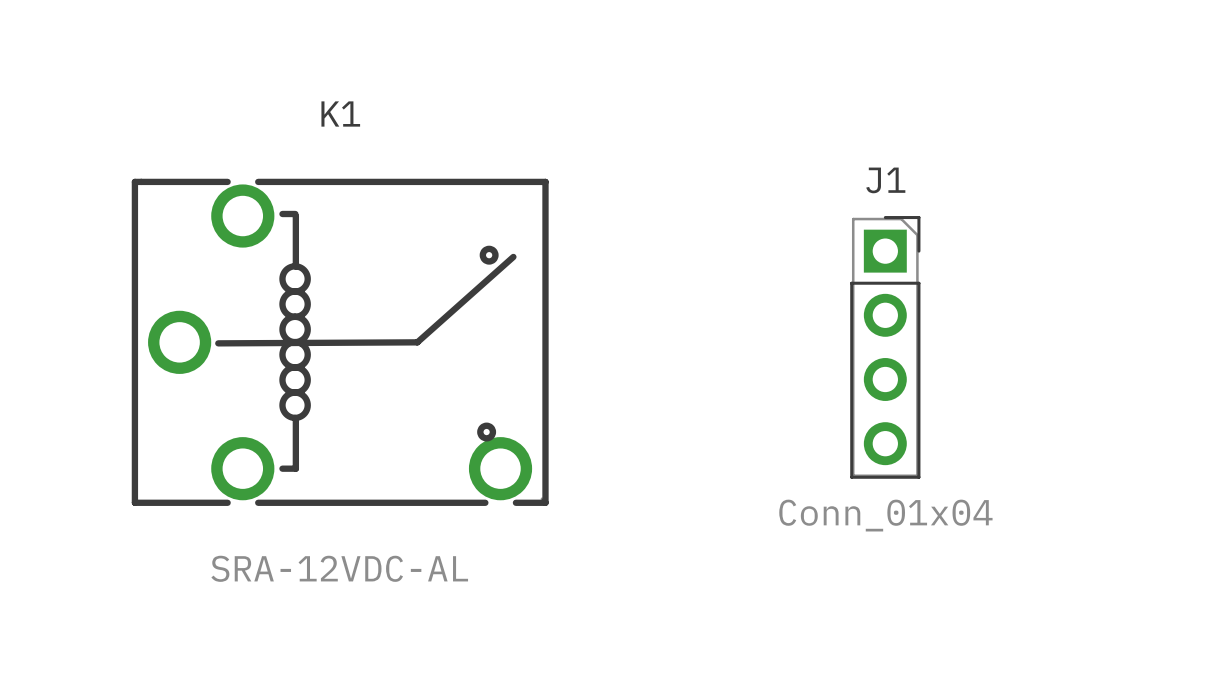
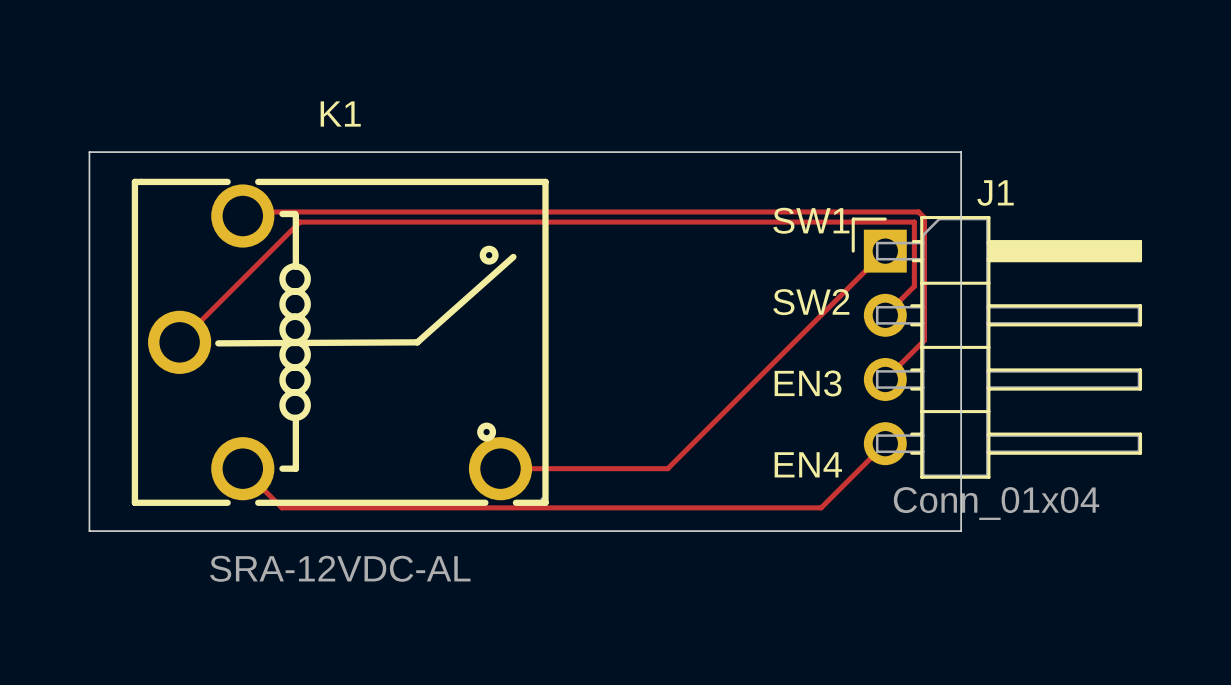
board edge: none -> (89, 152) (961, 152) (961, 531) (89, 531) (89, 152)
track: none -> (242, 216) (246, 211) (918, 211) (924, 217) (924, 340) (885, 379)
J1 footprint: [850, 216, 921, 479] -> [851, 216, 1143, 479]
text: none -> SW1 (811, 220)
track: none -> (885, 251) (667, 468) (500, 468)
text: none -> SW2 (811, 302)
track: none -> (885, 315) (914, 286) (914, 222) (299, 222) (179, 342)
text: none -> EN3 (808, 383)
track: none -> (885, 443) (821, 507) (281, 507) (242, 468)
text: none -> EN4 (808, 464)

